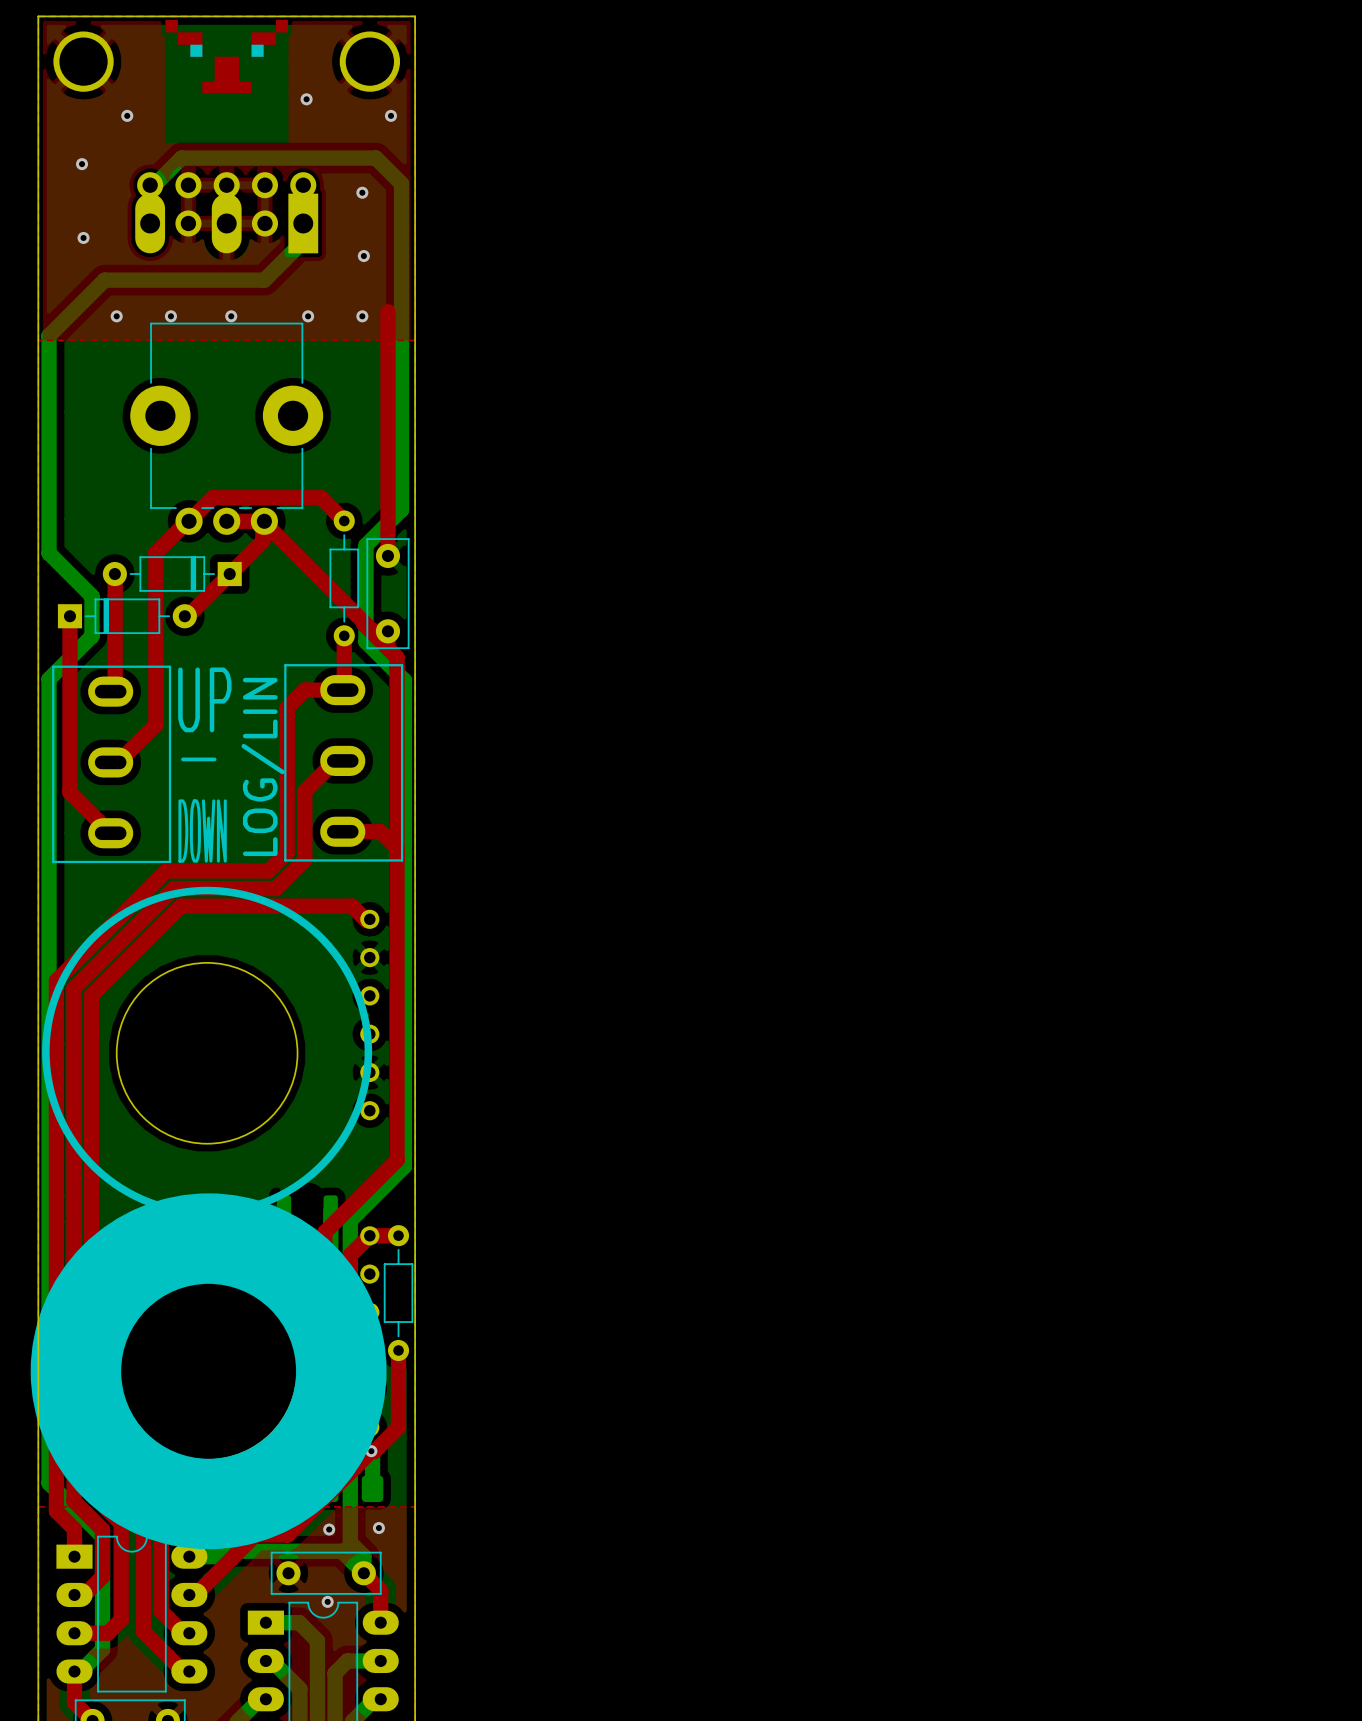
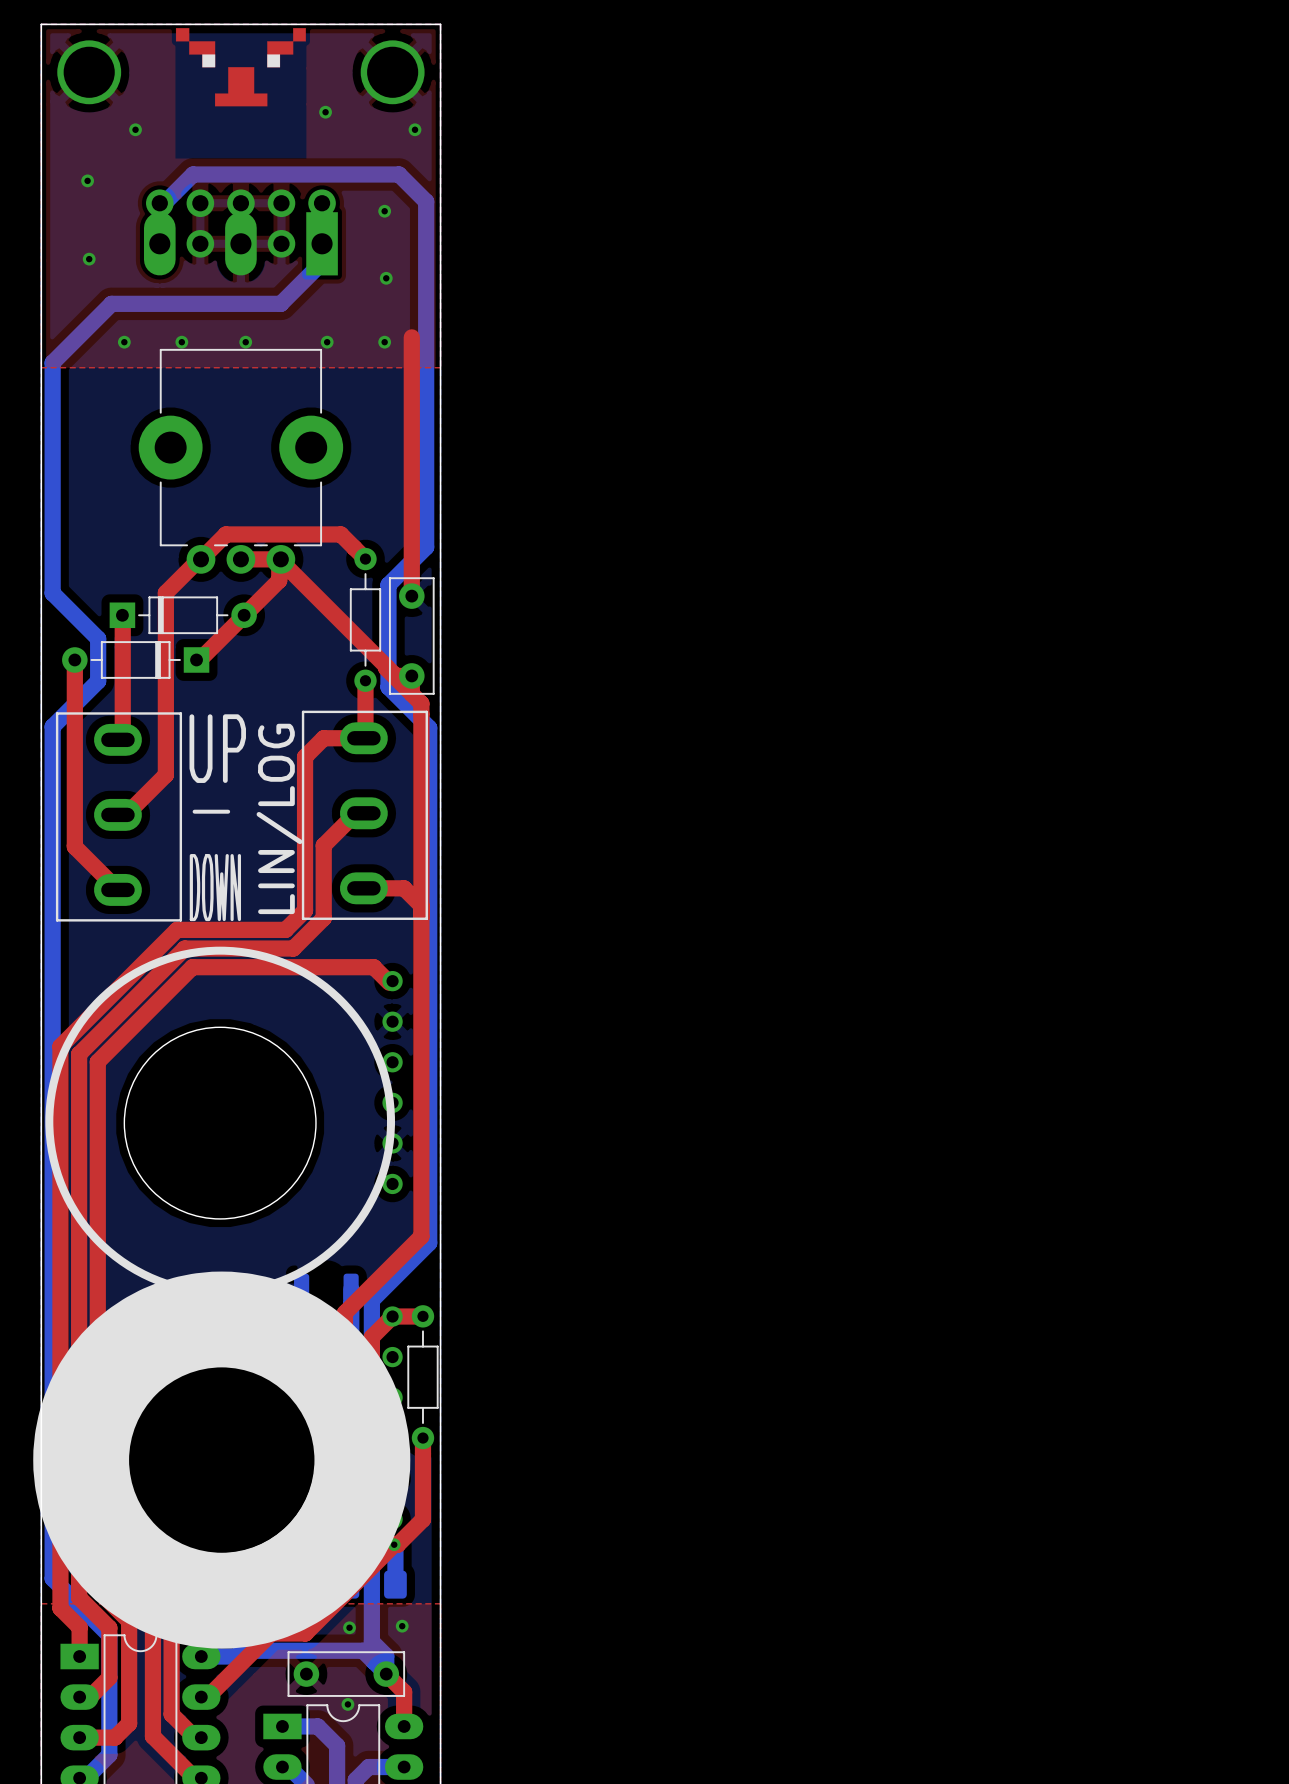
part rotation: 0° (172, 574) -> 180° (183, 615)
part rotation: 0° (127, 616) -> 180° (135, 659)
text: LOG/LIN (263, 766) -> LIN/LOG (279, 818)

